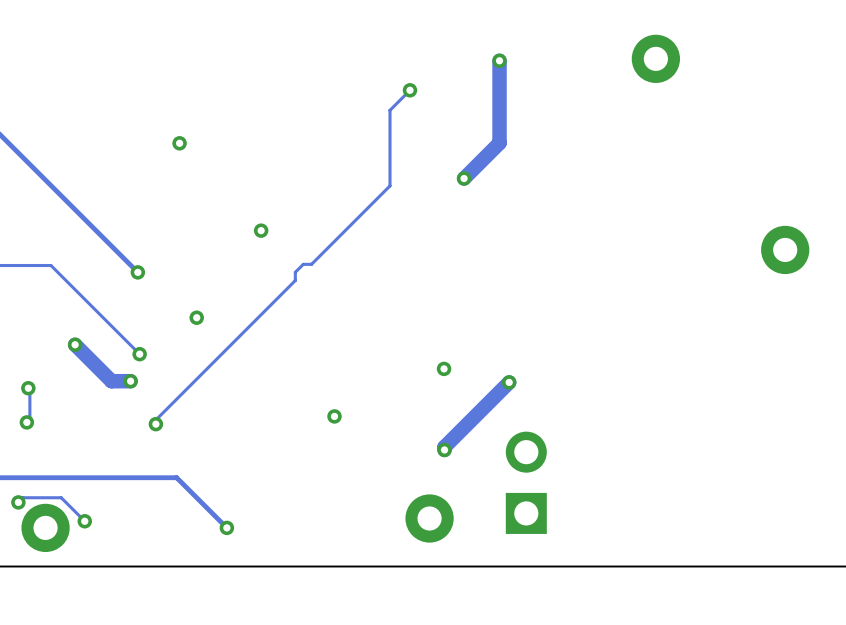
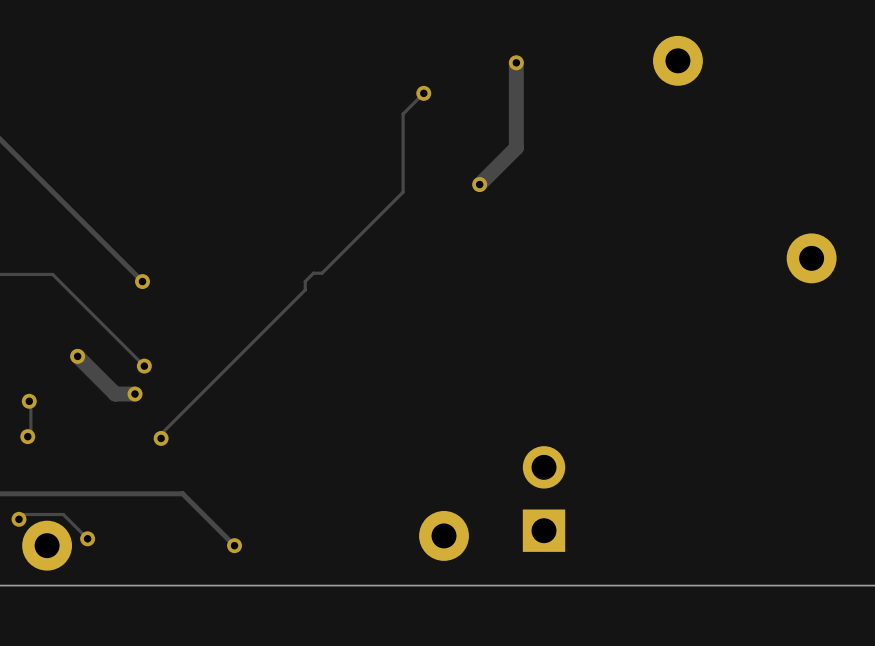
via: (179, 143) -> none
via: (261, 230) -> none
via: (196, 317) -> none
via: (444, 368) -> none
track: (509, 382) (444, 447) (444, 449) -> none
via: (509, 382) -> none
via: (334, 416) -> none
via: (444, 449) -> none

